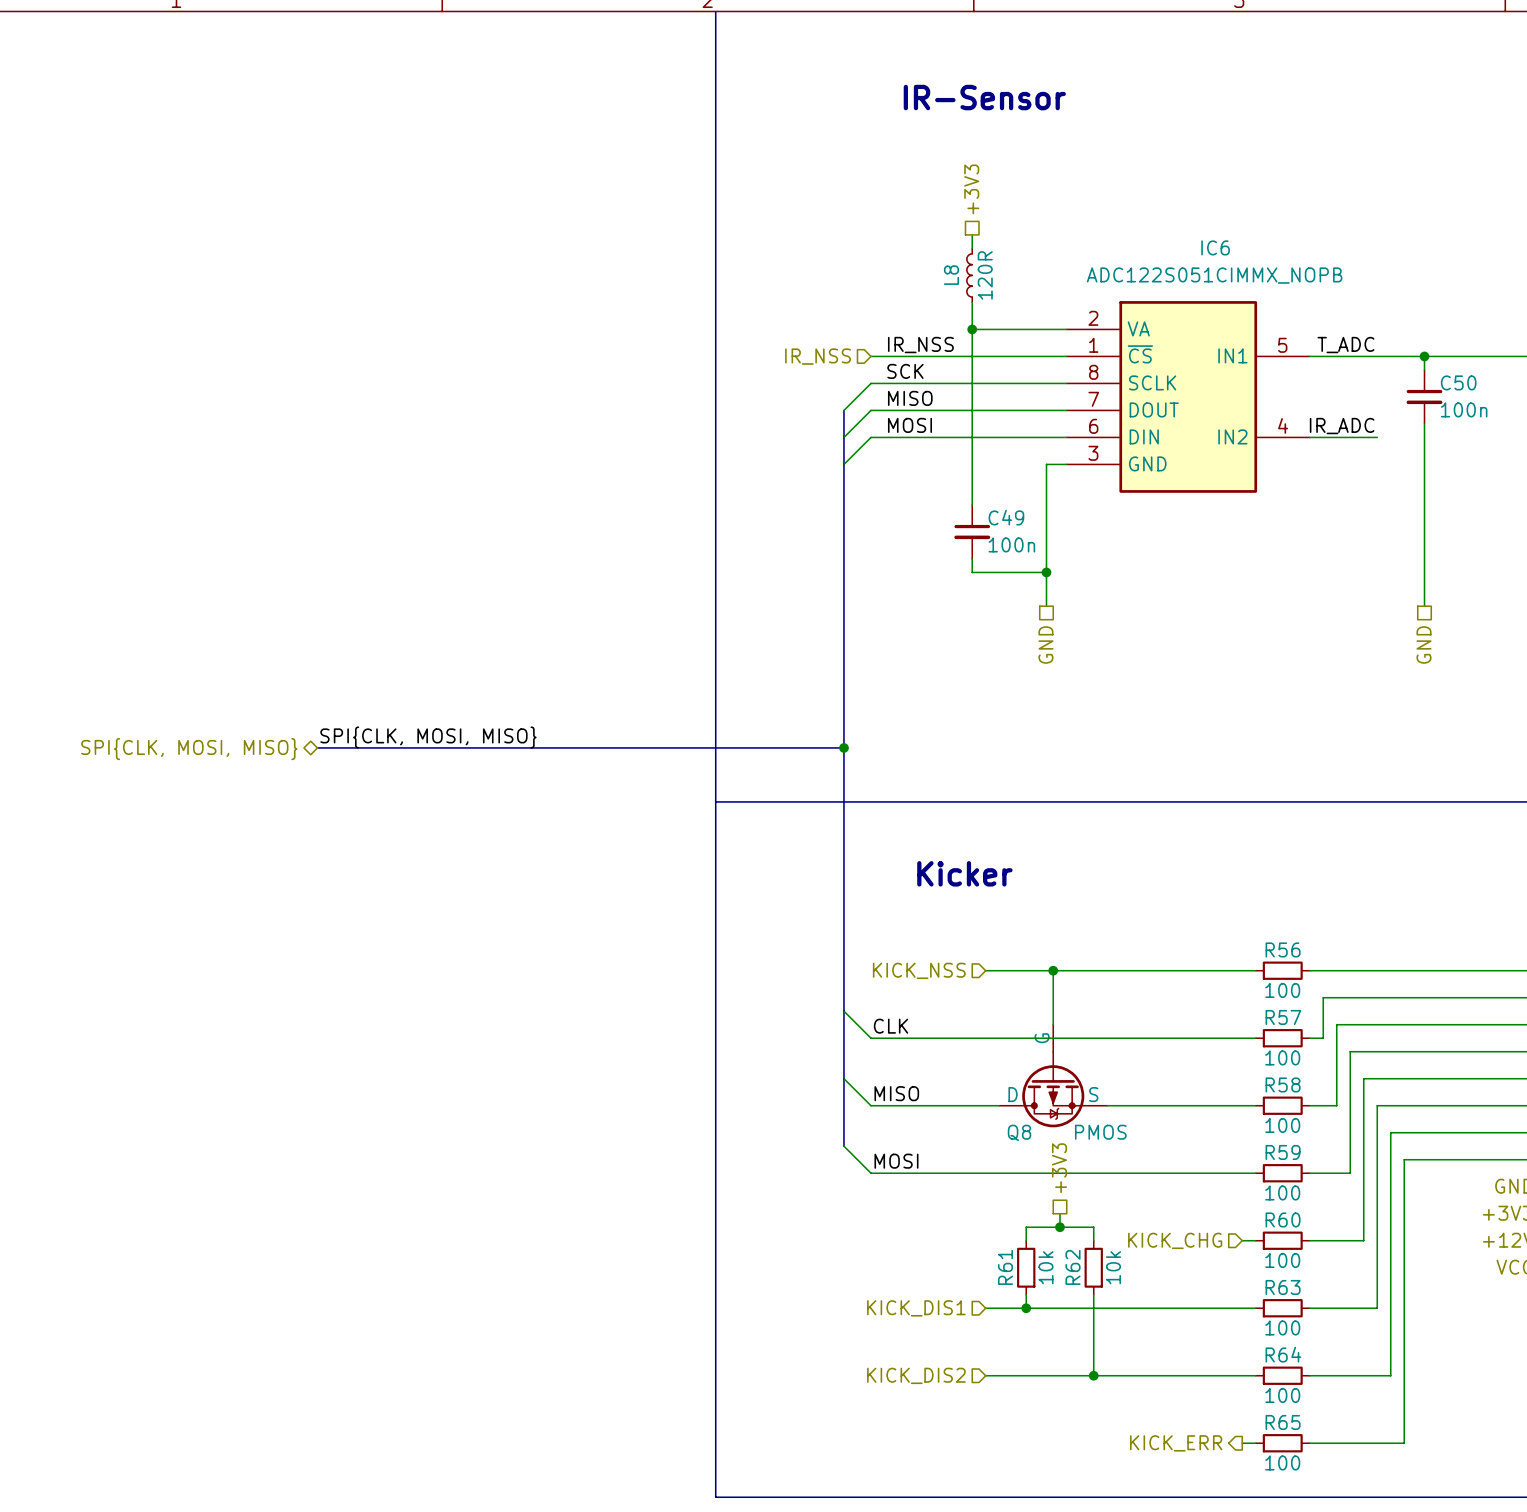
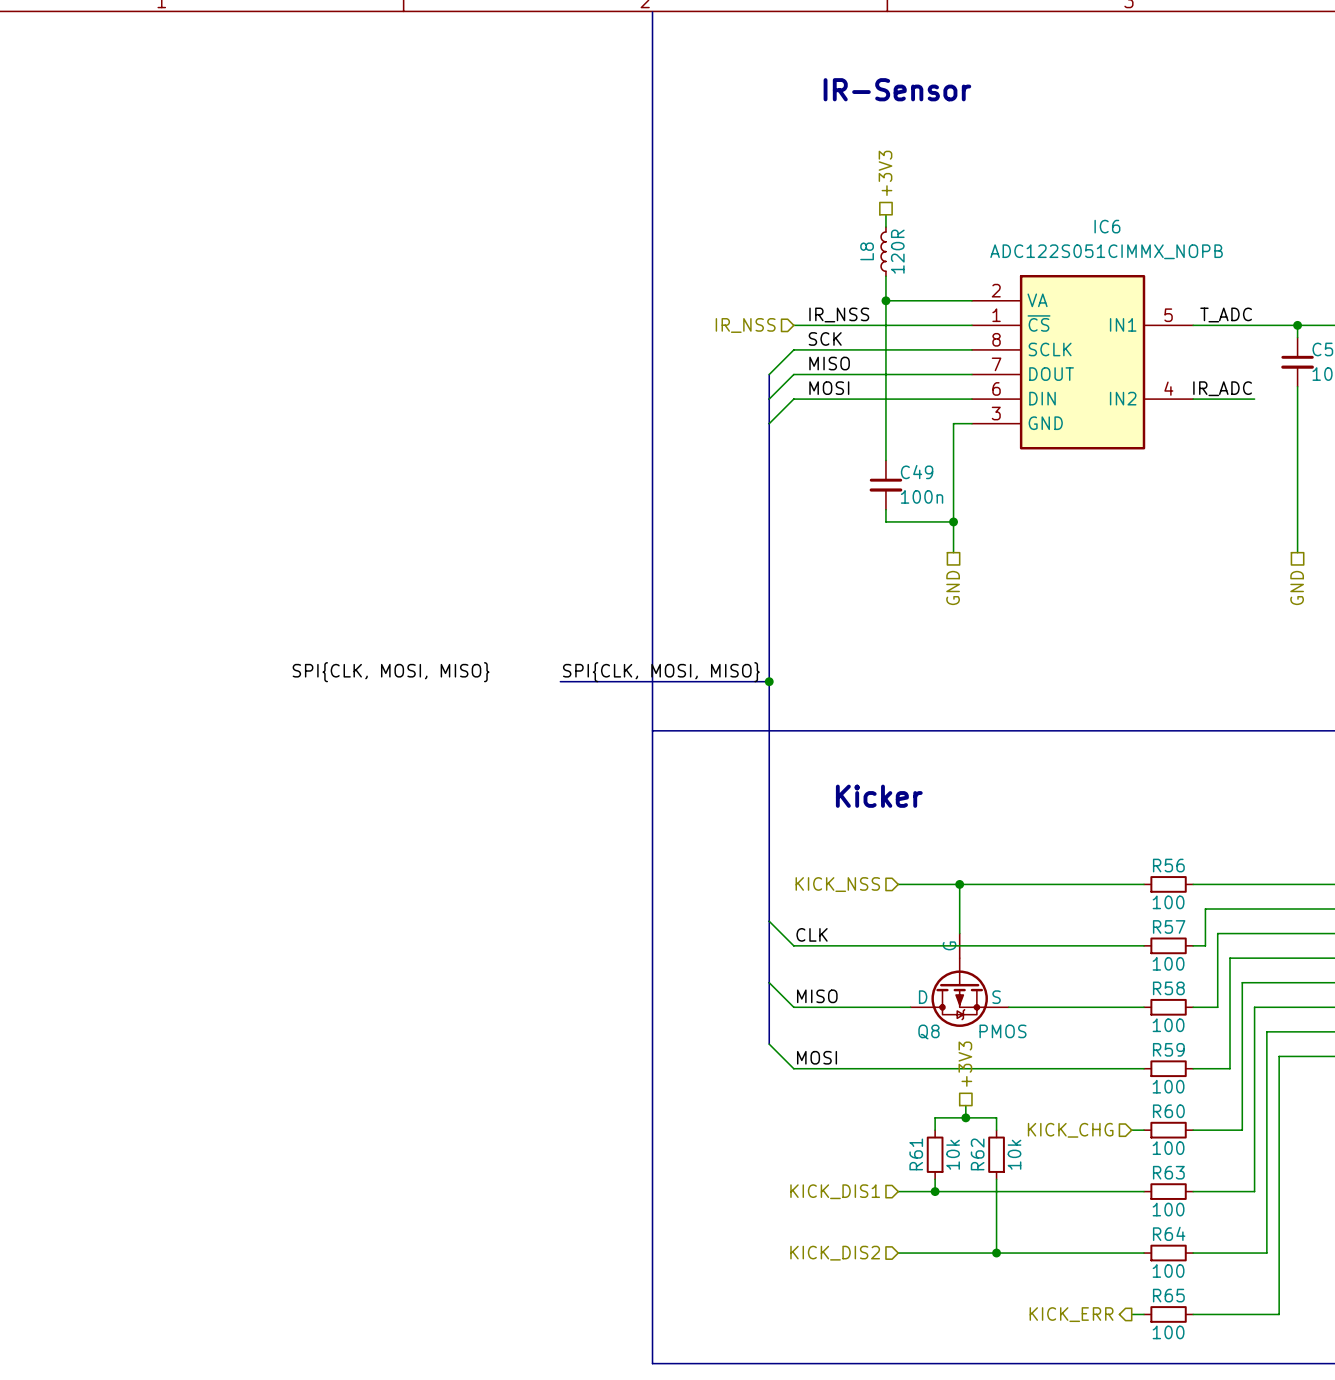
label: none -> SPI{CLK, MOSI, MISO} (661, 672)
bus: (317, 747) (614, 747) -> none
hierarchical label: SPI{CLK, MOSI, MISO} (189, 749) -> none

